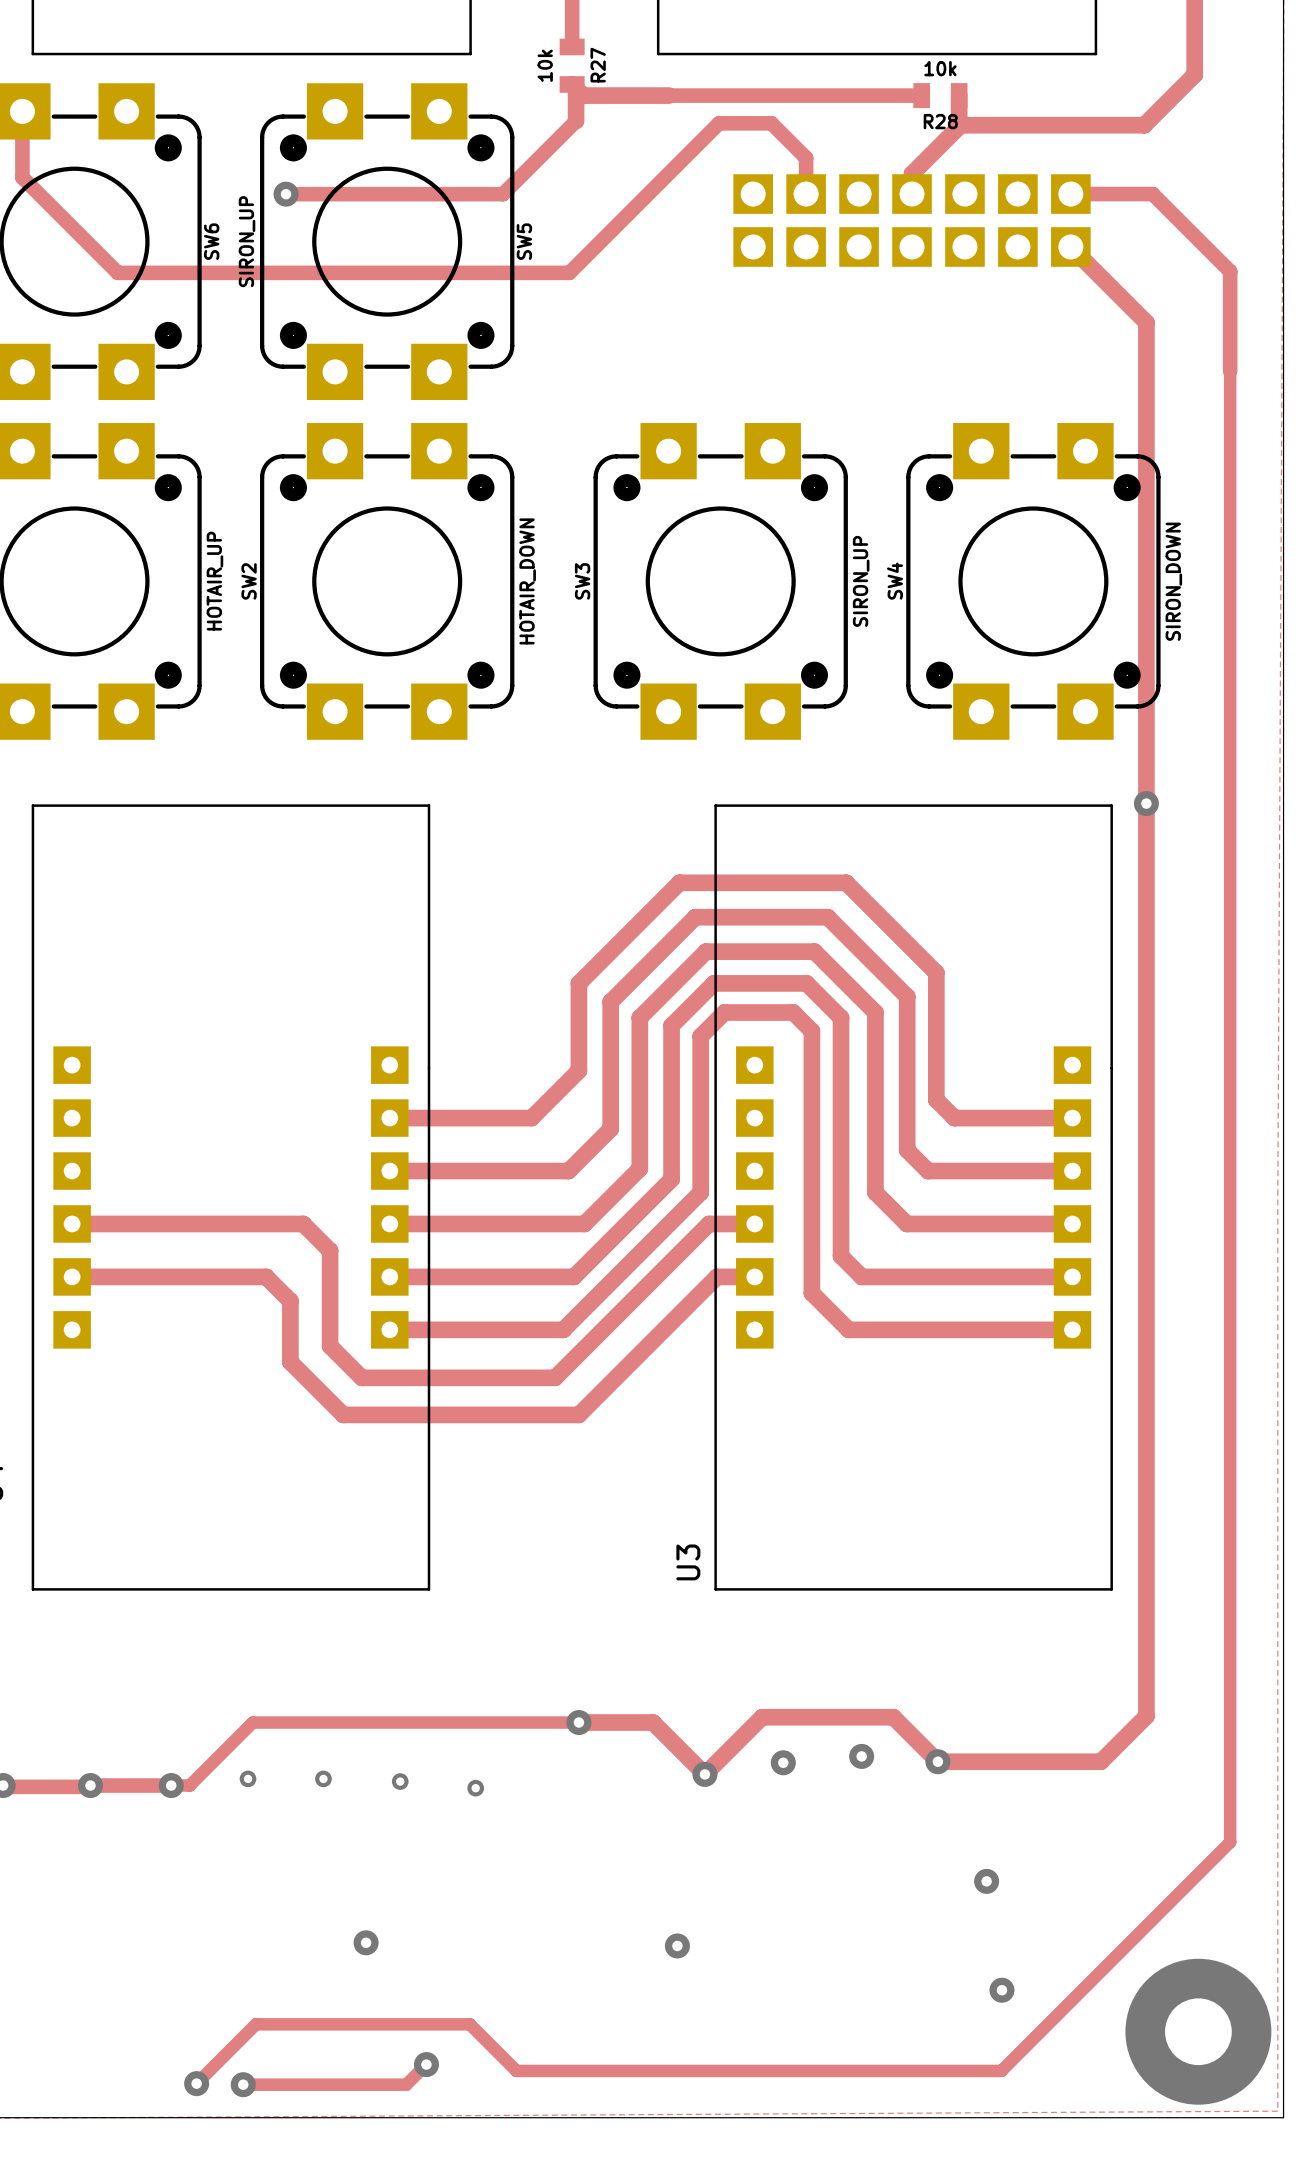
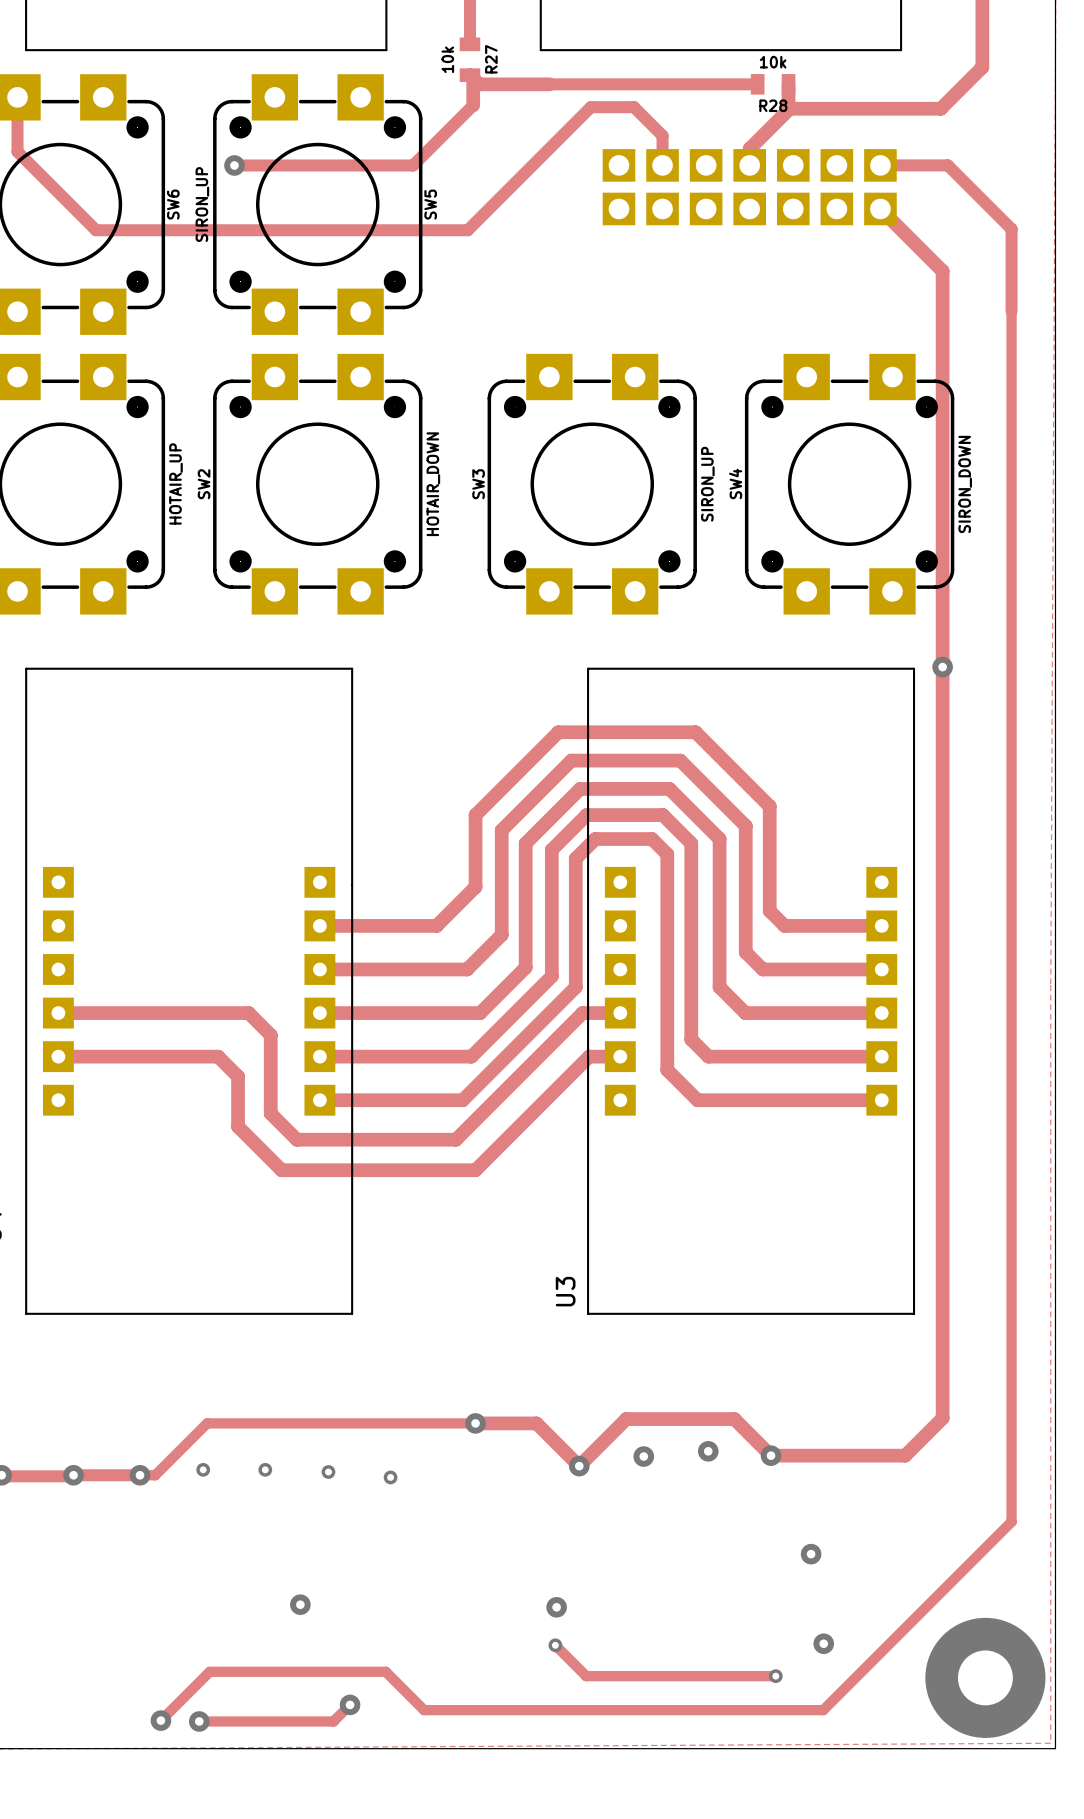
track: none -> (555, 1645) (586, 1676) (775, 1676)
via: none -> (555, 1645)
via: none -> (775, 1676)

